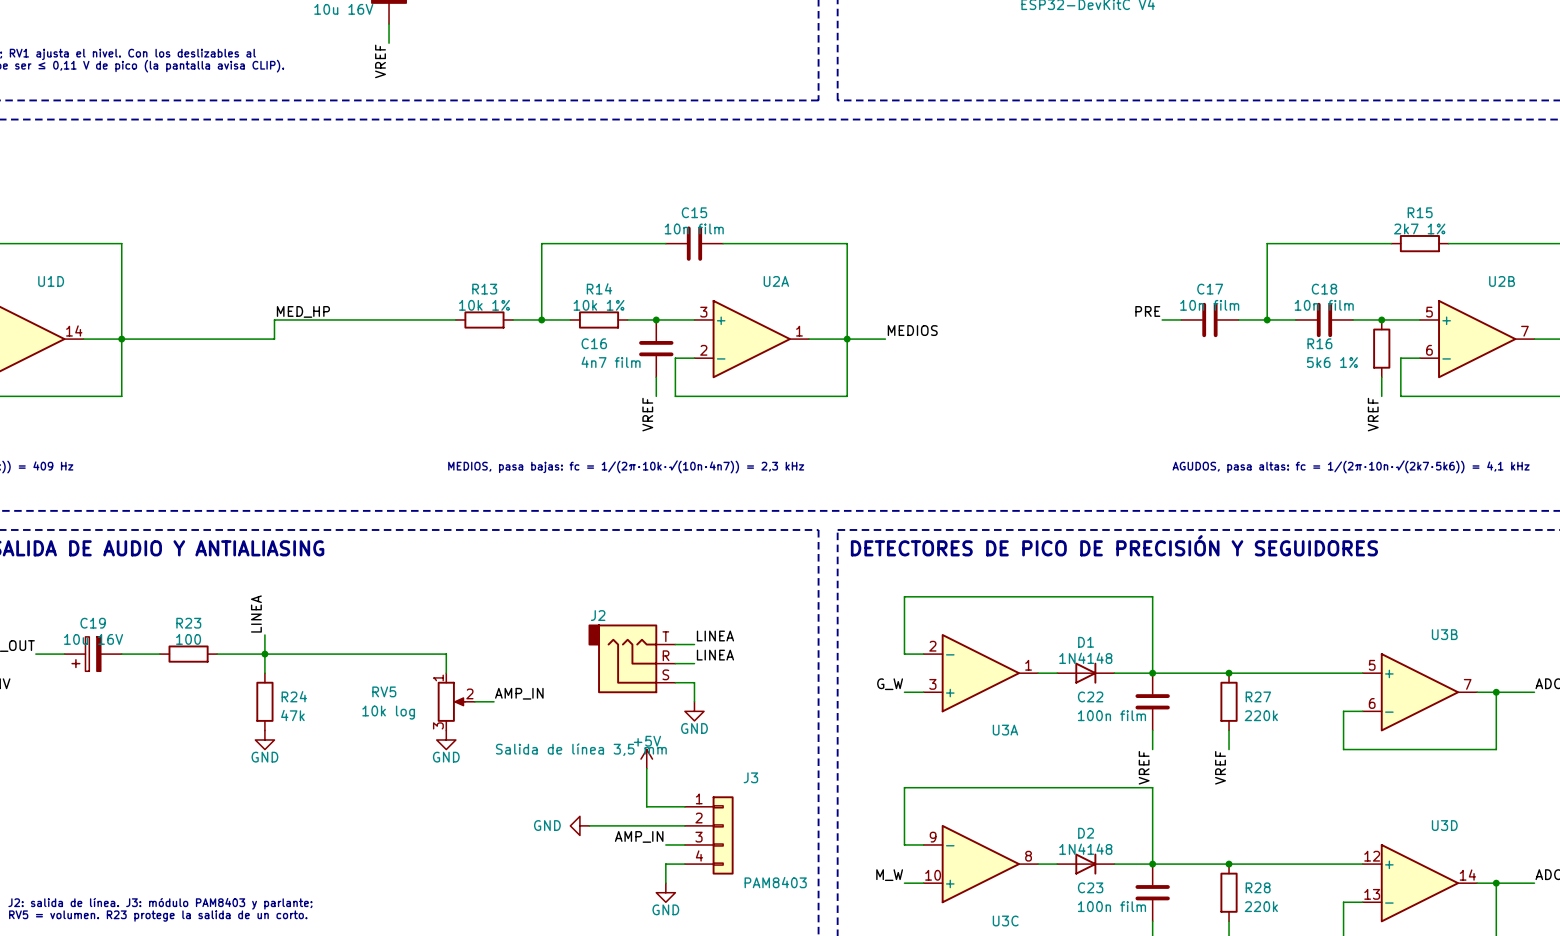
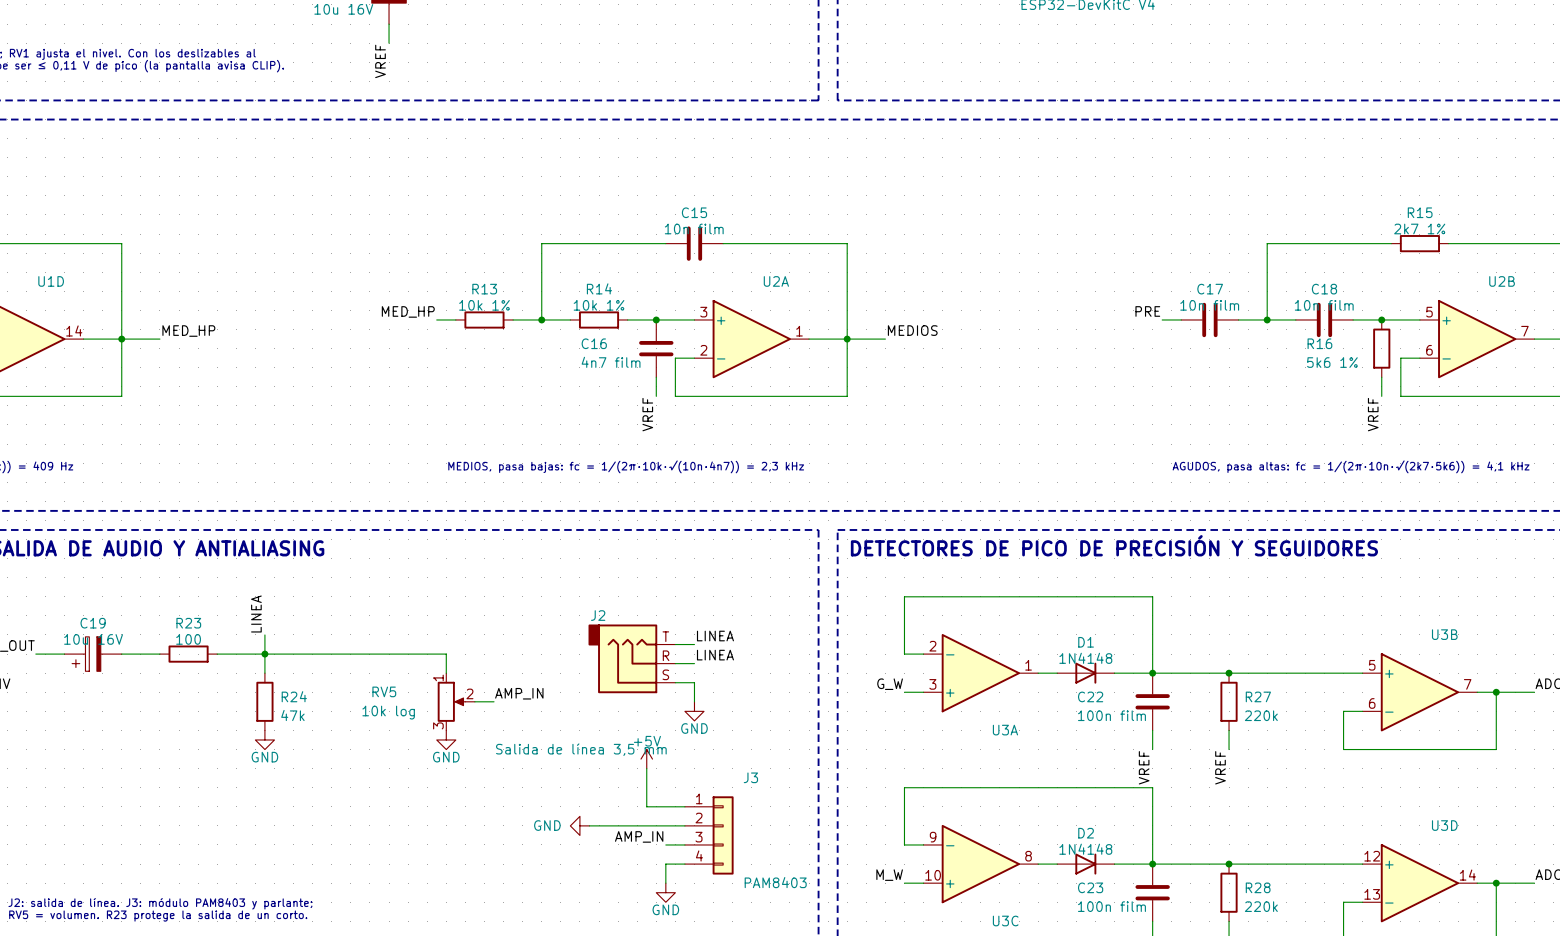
label: MED_HP (303, 311) -> none
label: none -> MED_HP (408, 311)
wire: (436, 319) (274, 319) (274, 339) (159, 339) -> none
label: none -> MED_HP (188, 331)

